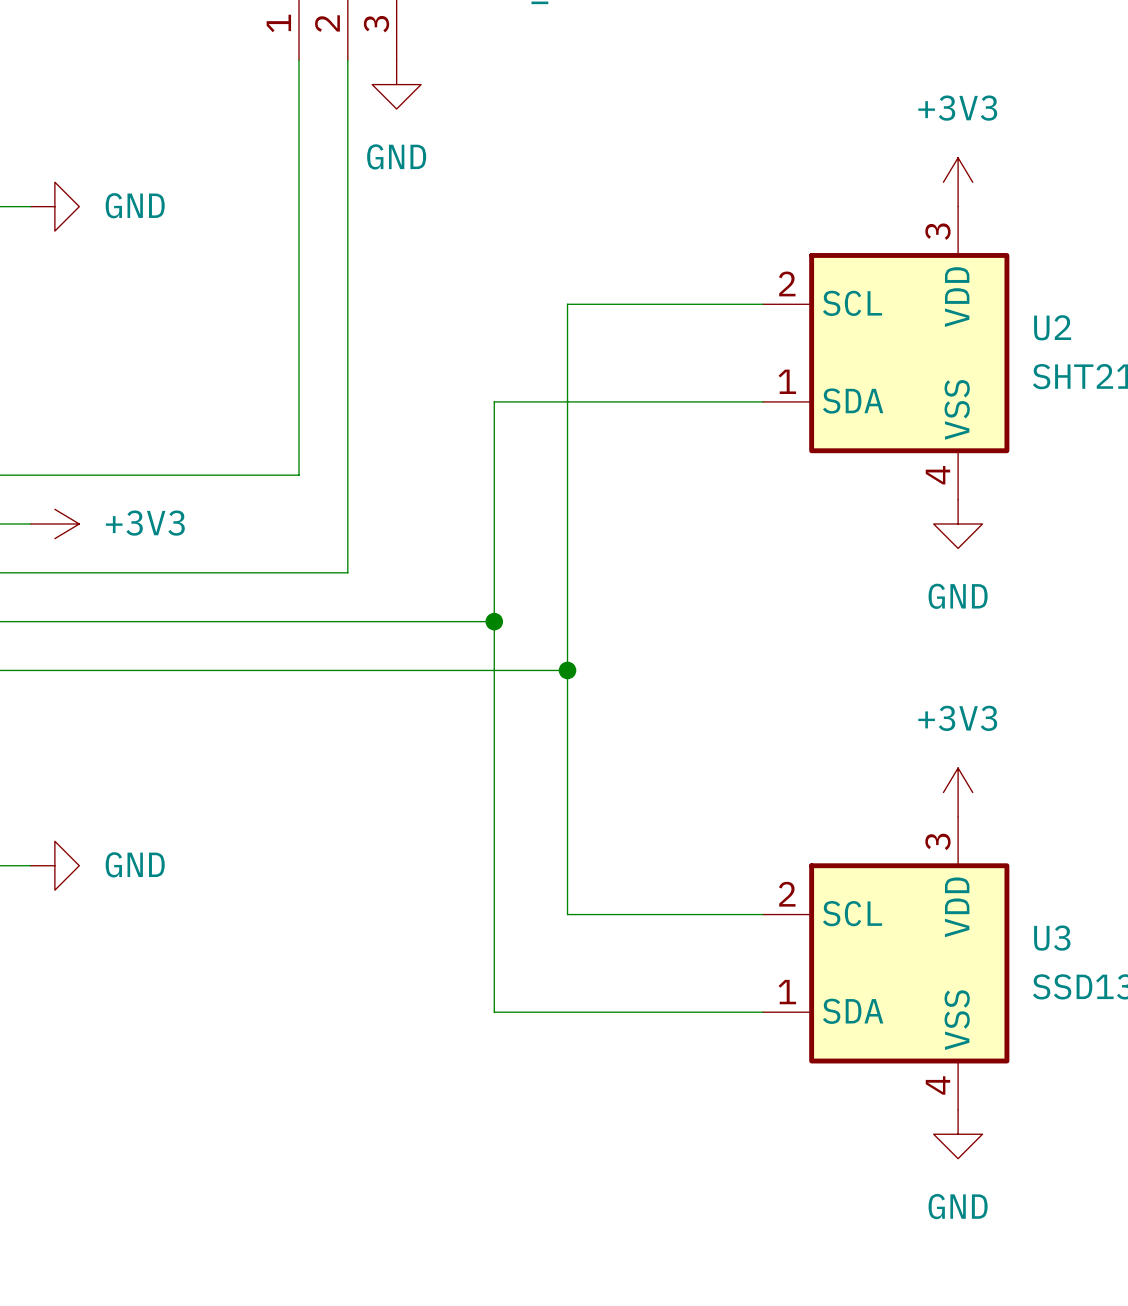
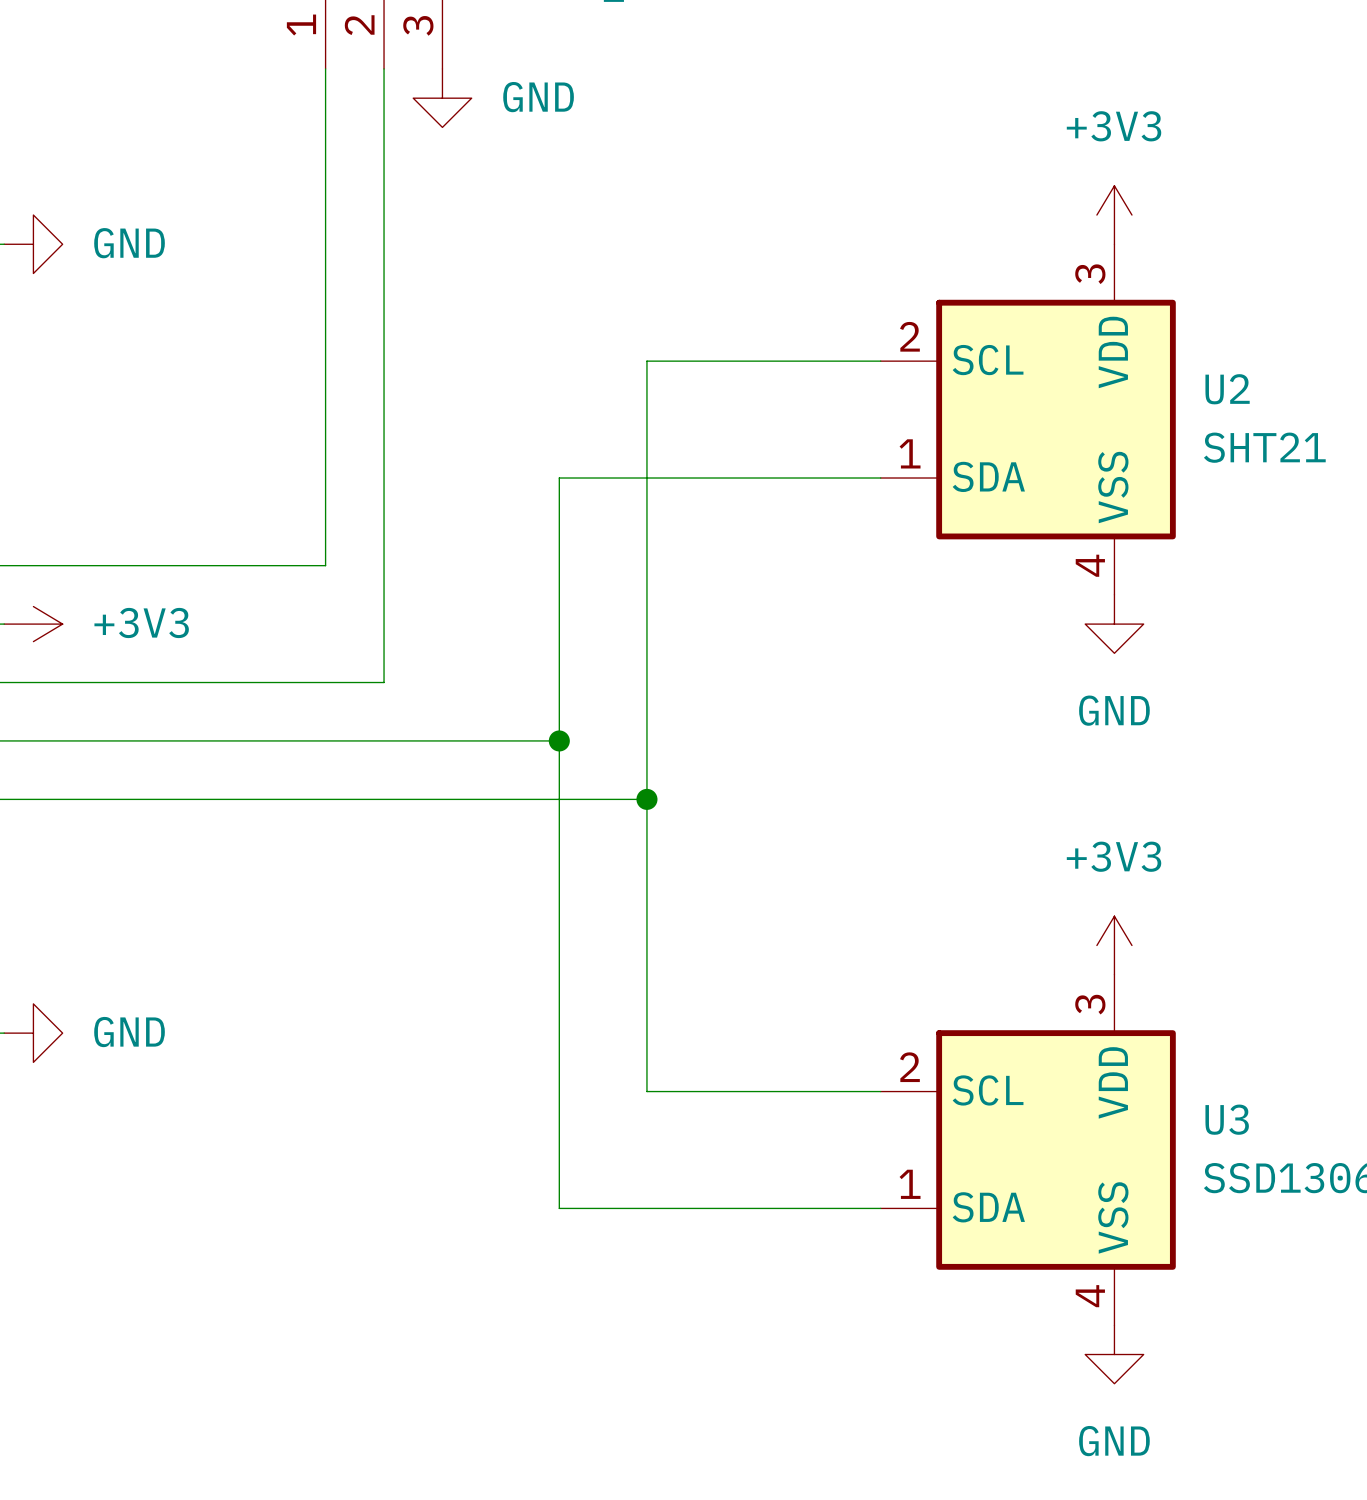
power symbol text position: GND (396, 156) -> GND (538, 97)

